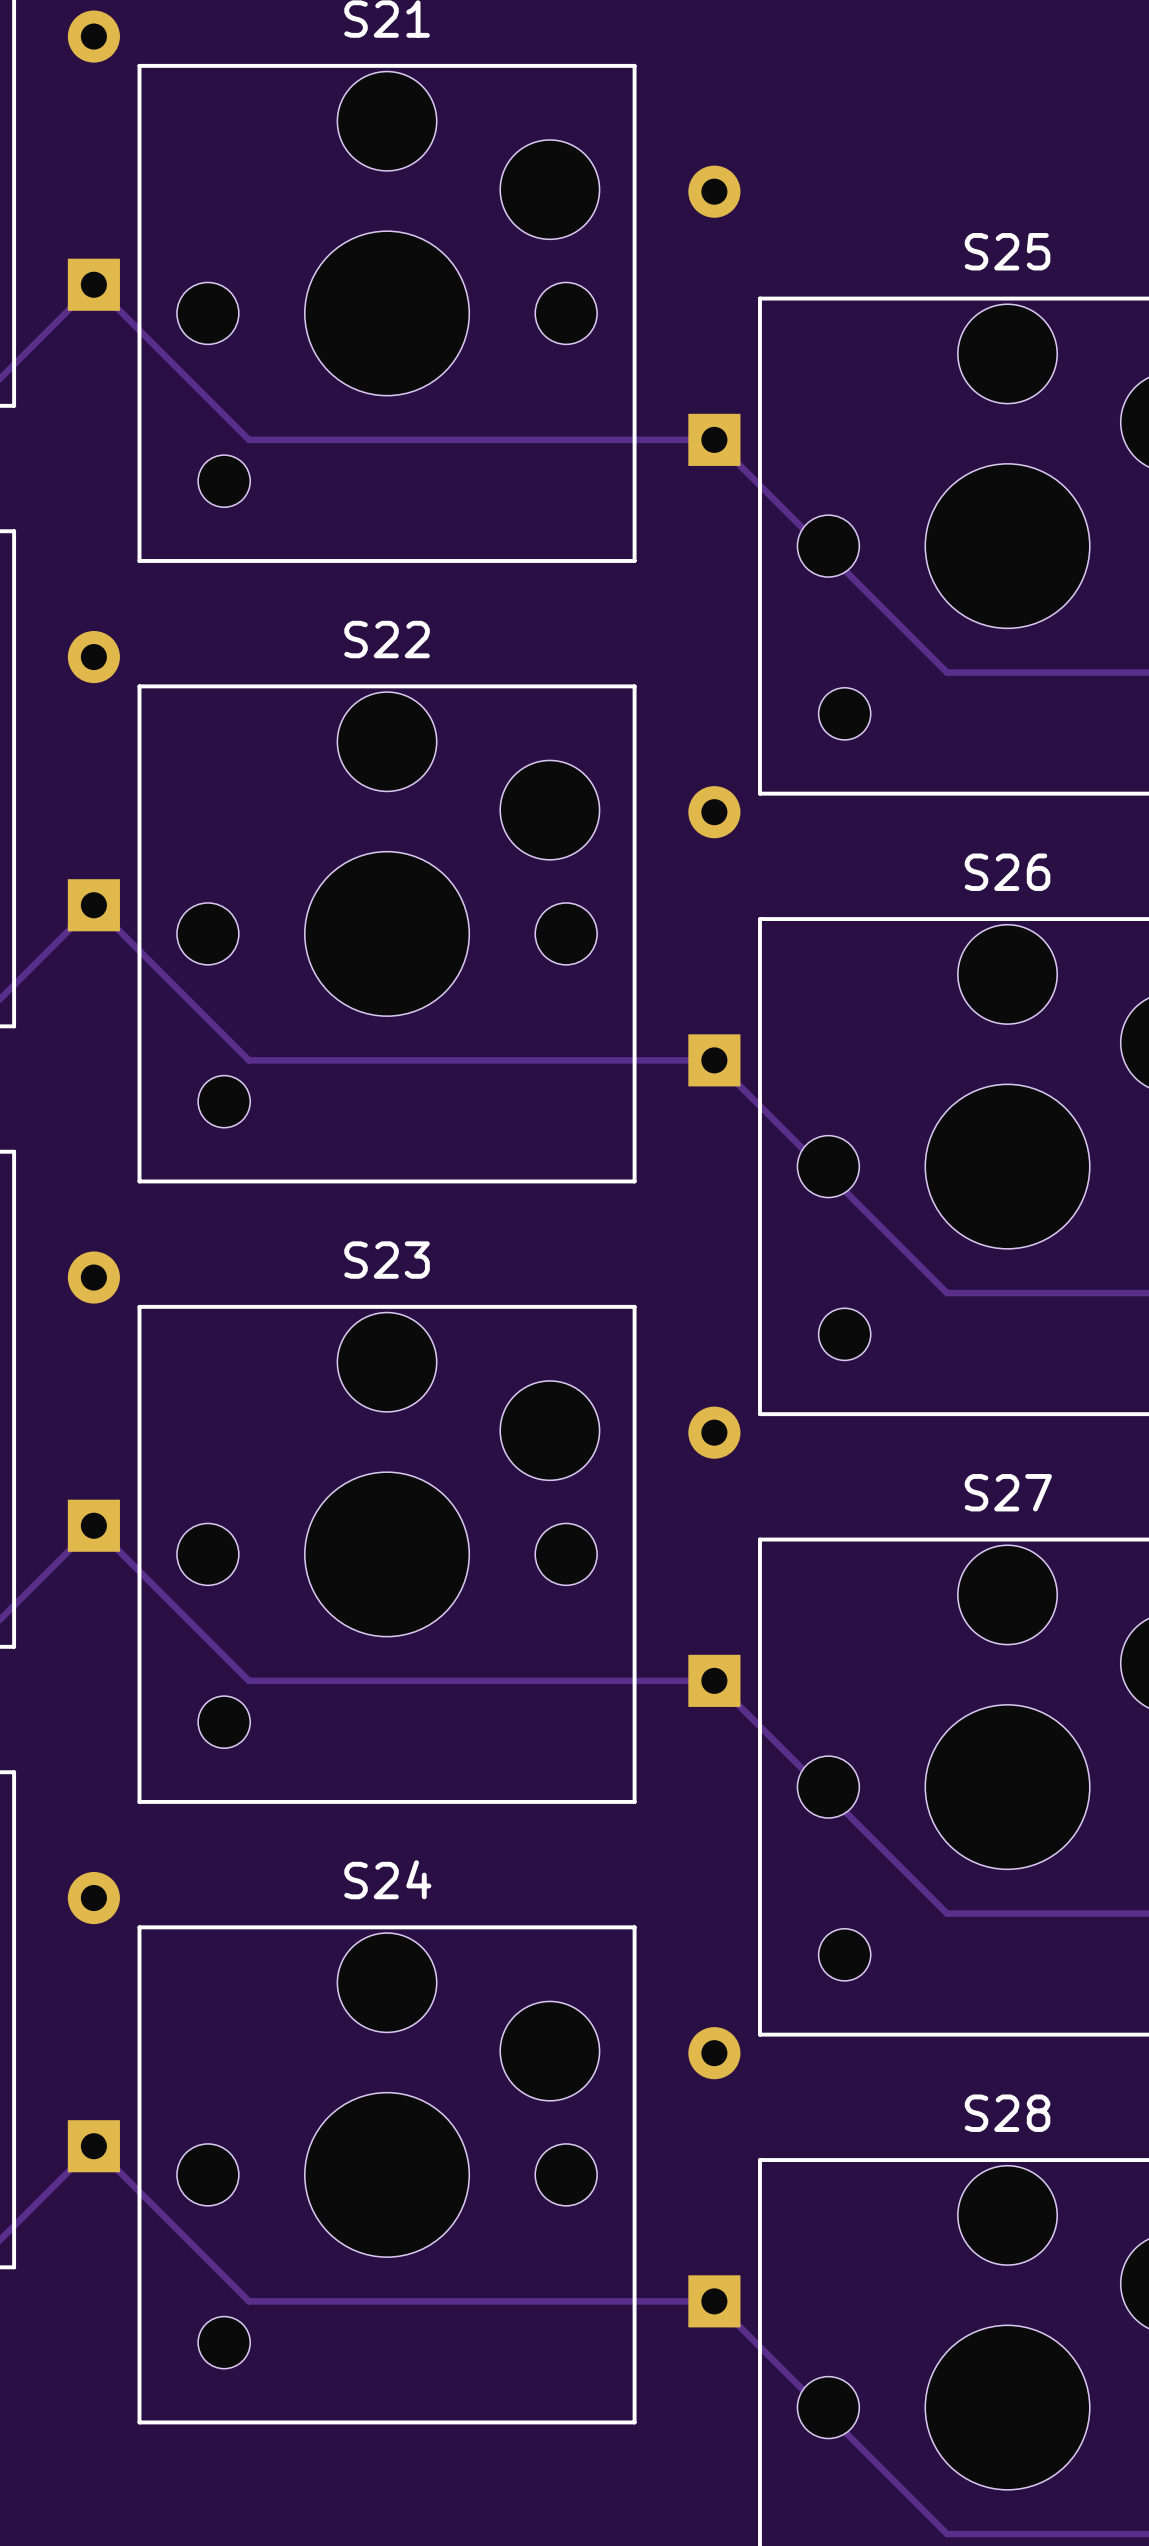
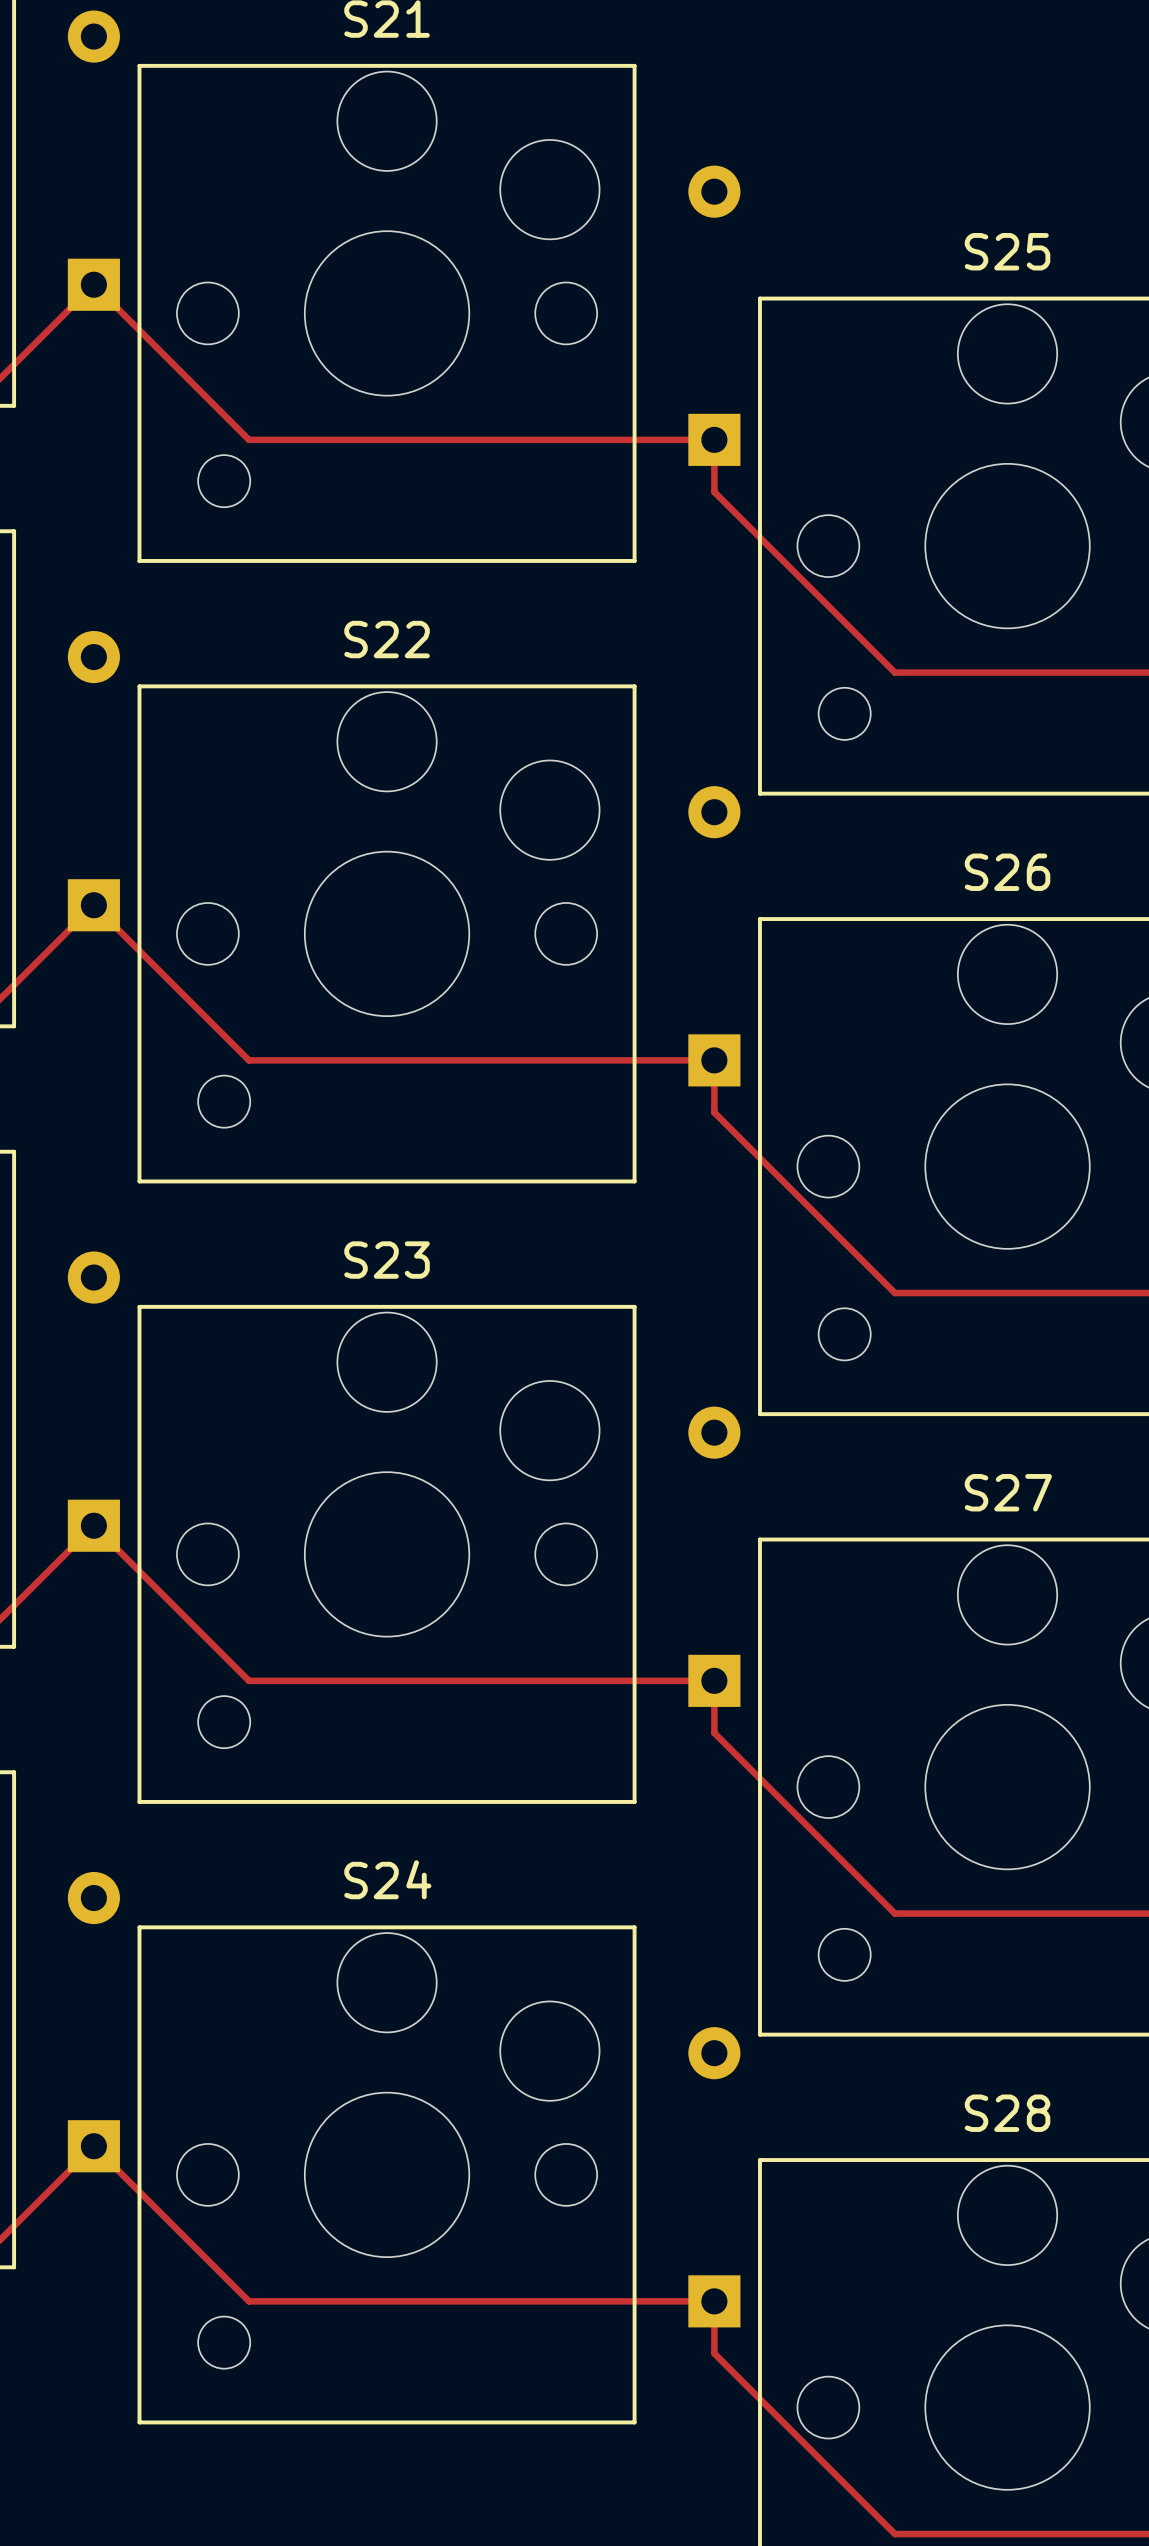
track: (714, 439) (947, 672) -> (714, 439) (714, 492) (894, 672) (947, 672)
track: (714, 1060) (947, 1293) -> (714, 1060) (714, 1112) (894, 1293) (947, 1293)
track: (714, 1680) (947, 1913) -> (714, 1680) (714, 1733) (894, 1913) (947, 1913)
track: (714, 2301) (947, 2534) -> (714, 2301) (714, 2353) (894, 2534) (947, 2534)

